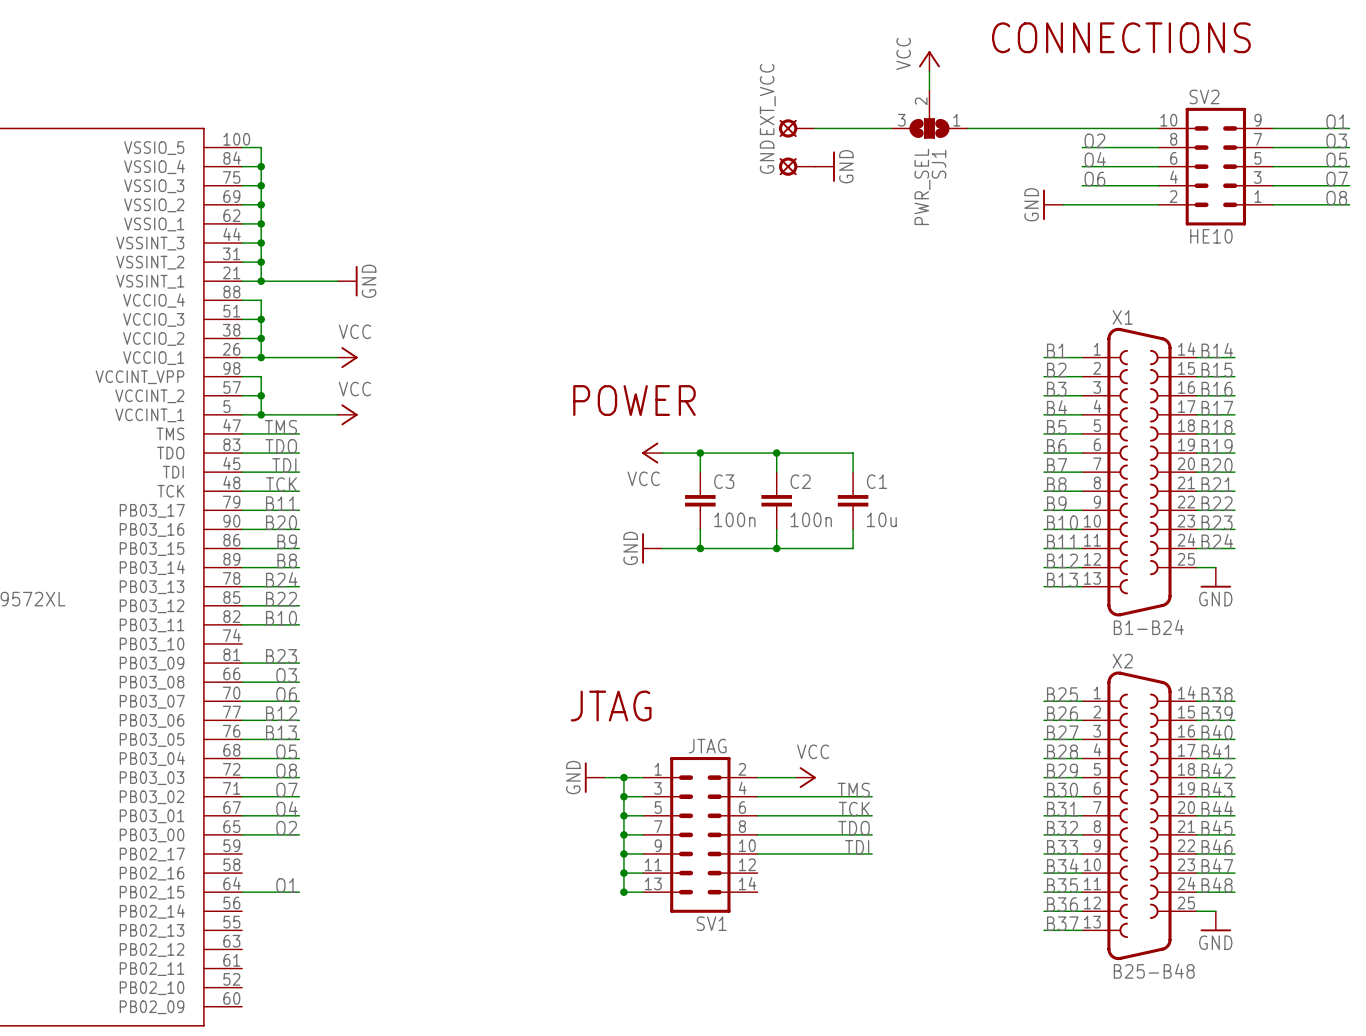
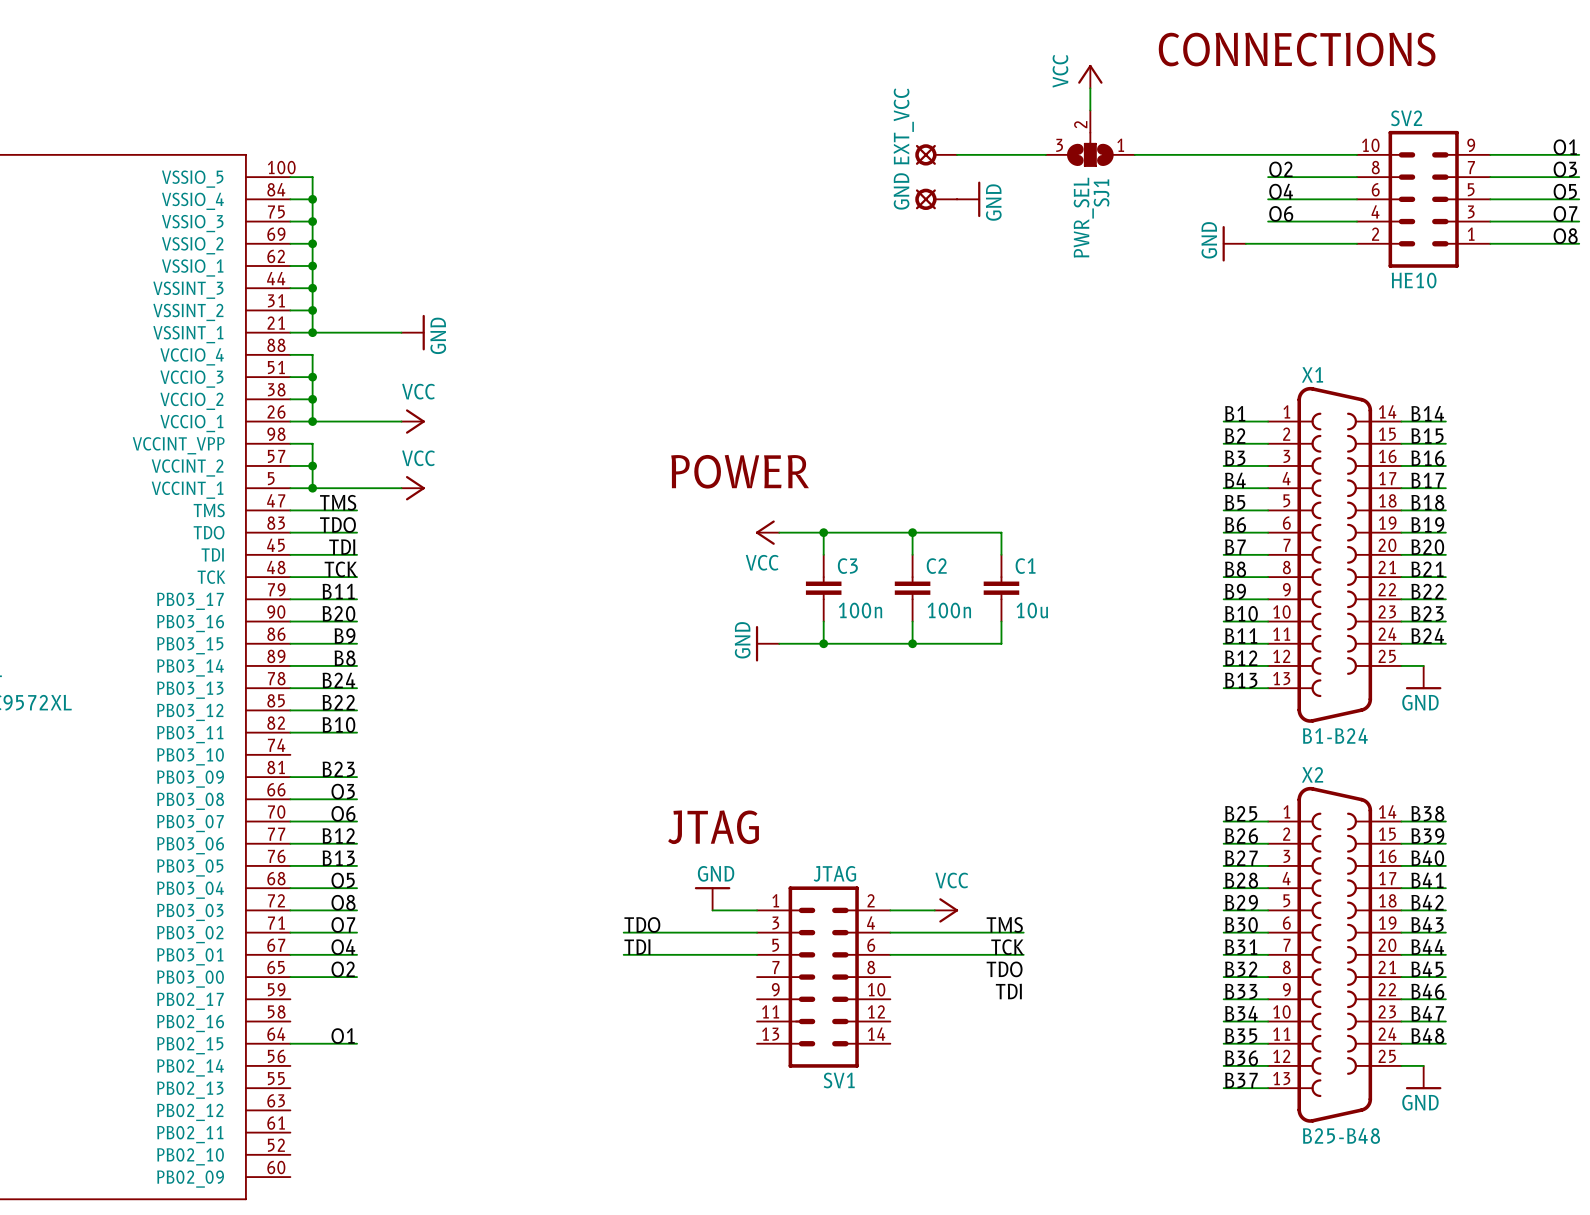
power symbol rotation: 0° (585, 777) -> 90° clockwise (712, 888)
wire: (623, 777) (623, 892) (643, 892) -> none
junction: (623, 777) -> none
label: none -> TDO (642, 924)
wire: none -> (623, 932) (734, 932)
junction: (623, 796) -> none
label: none -> TDI (637, 947)
wire: none -> (623, 954) (734, 954)
junction: (623, 815) -> none
wire: (623, 834) (643, 834) -> none
junction: (623, 834) -> none
wire: (757, 834) (872, 834) -> none
wire: (623, 853) (643, 853) -> none
junction: (623, 853) -> none
wire: (757, 853) (872, 853) -> none
wire: (623, 873) (643, 873) -> none
junction: (623, 873) -> none
junction: (623, 892) -> none

